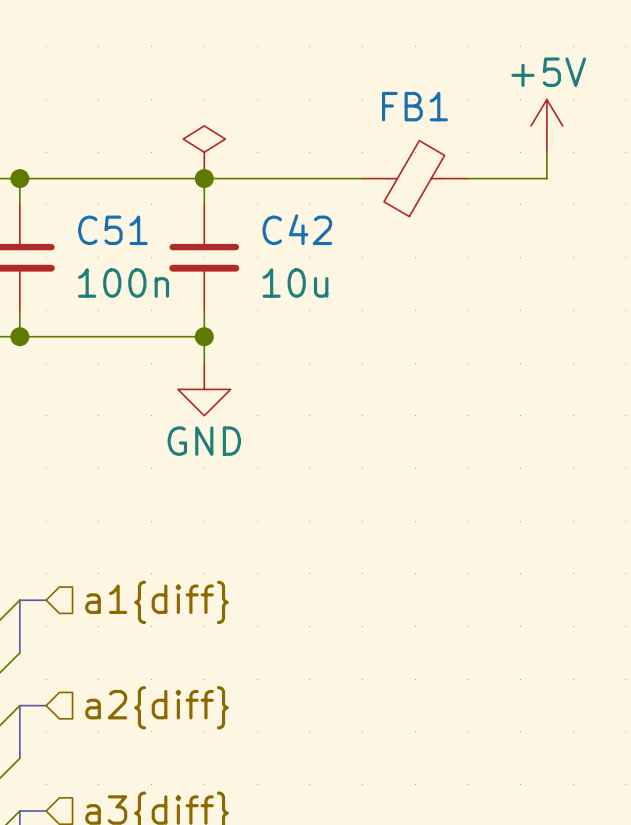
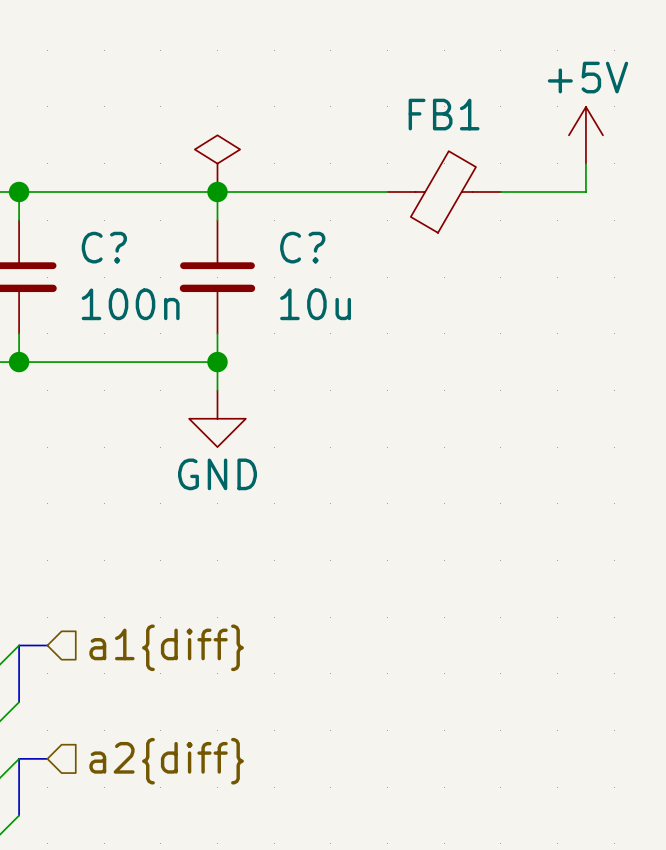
C42 name: C42 (297, 229) -> C? (302, 247)
C51 name: C51 (112, 230) -> C? (104, 247)

